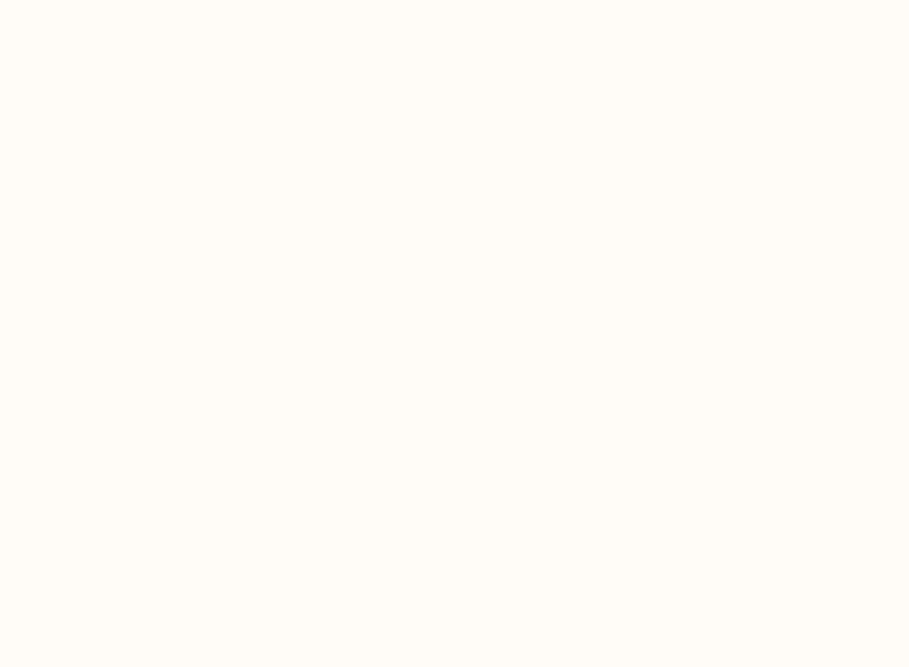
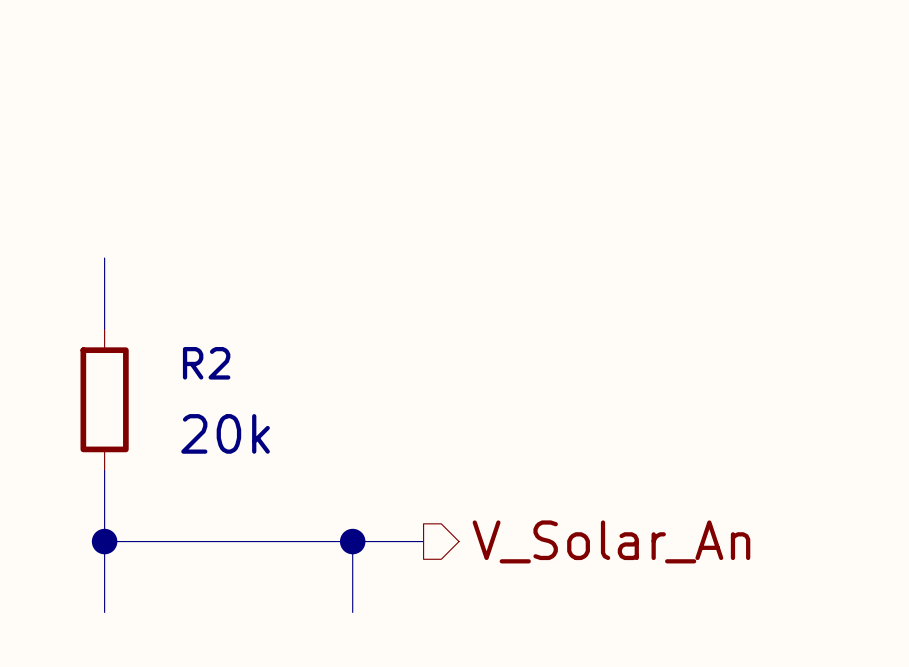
wire: none -> (104, 258) (104, 328)
R2: none -> 20k (104, 399)
wire: none -> (104, 470) (104, 612)
wire: none -> (104, 541) (423, 541)
junction: none -> (104, 541)
wire: none -> (352, 541) (352, 612)
junction: none -> (352, 541)
hierarchical label: none -> V_Solar_An (611, 541)

